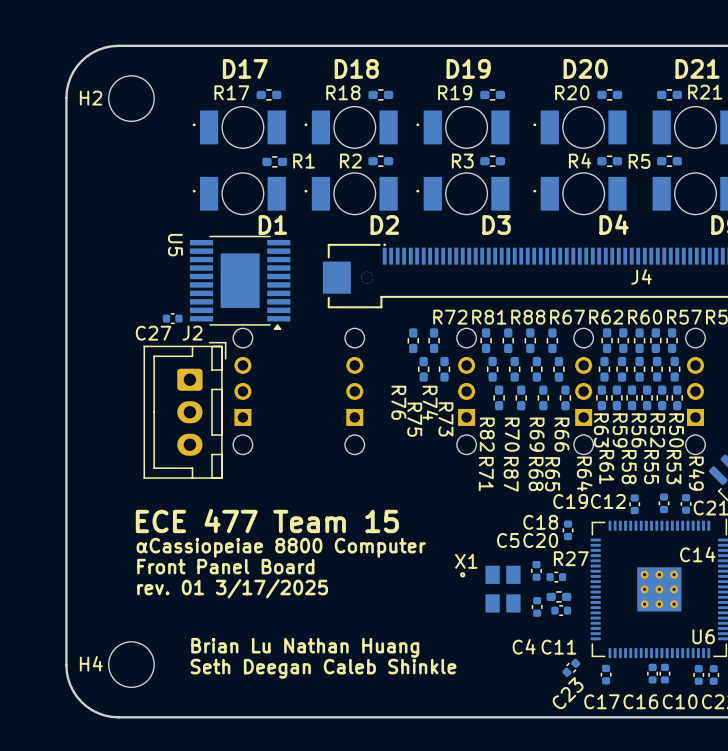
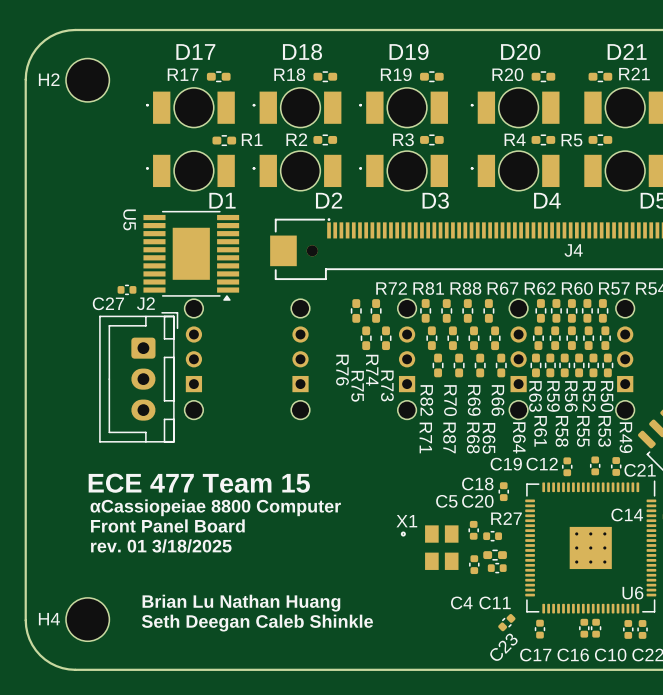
text: rev. 01 3/17/2025 (232, 588) -> rev. 01 3/18/2025 (161, 545)

